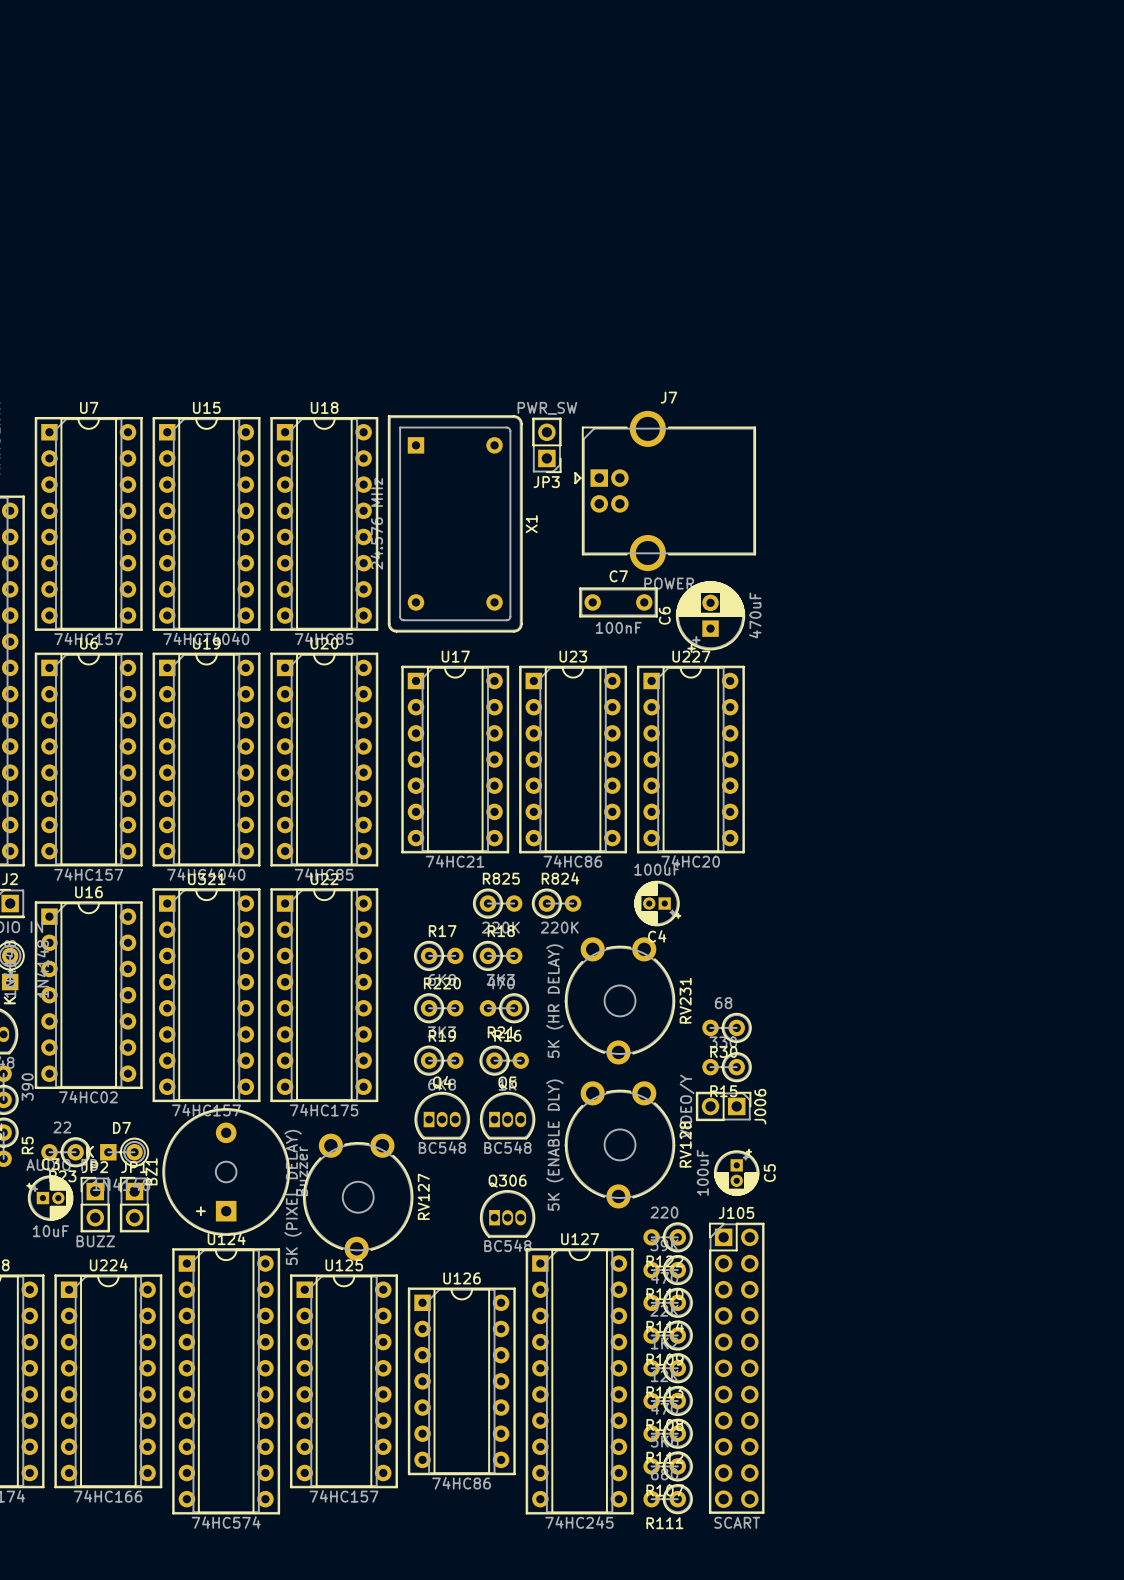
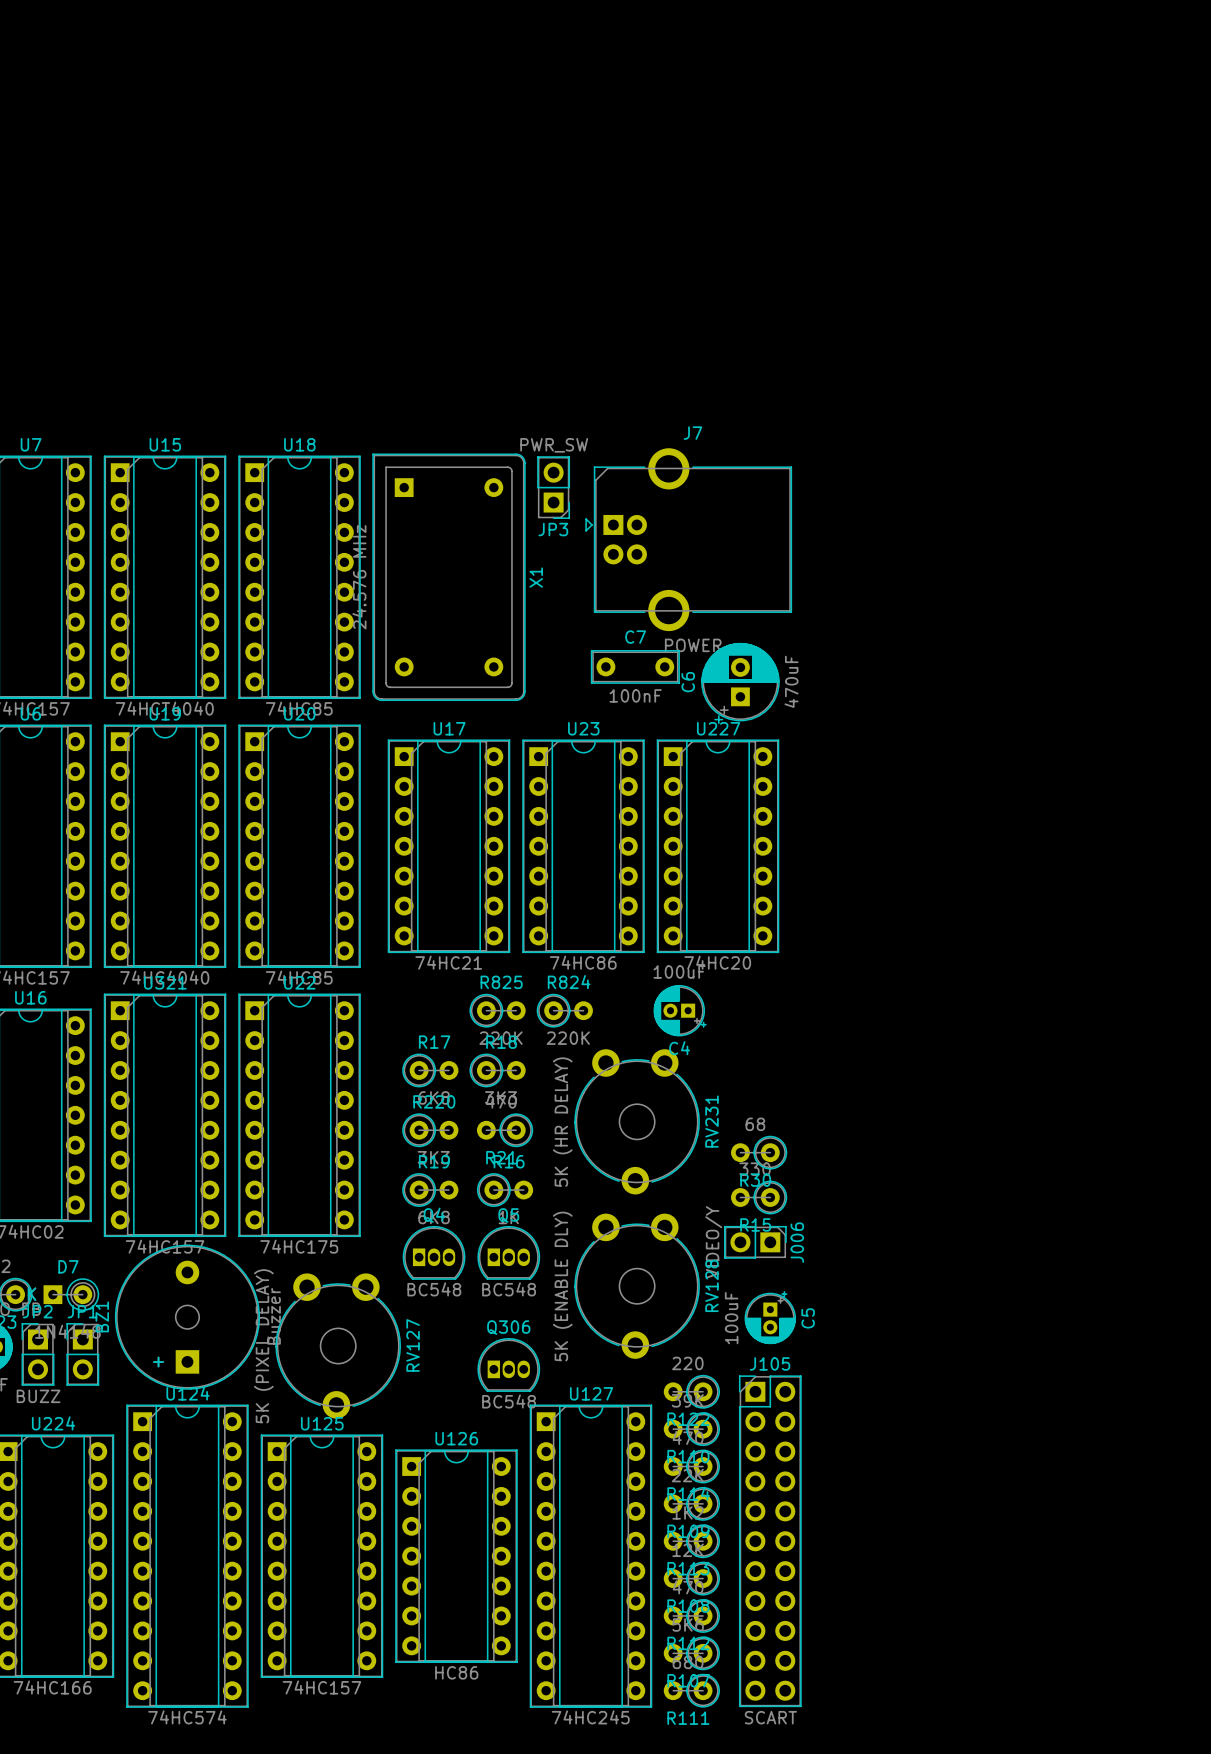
U126 value: 74HC86 (461, 1483) -> HC86 (456, 1672)

